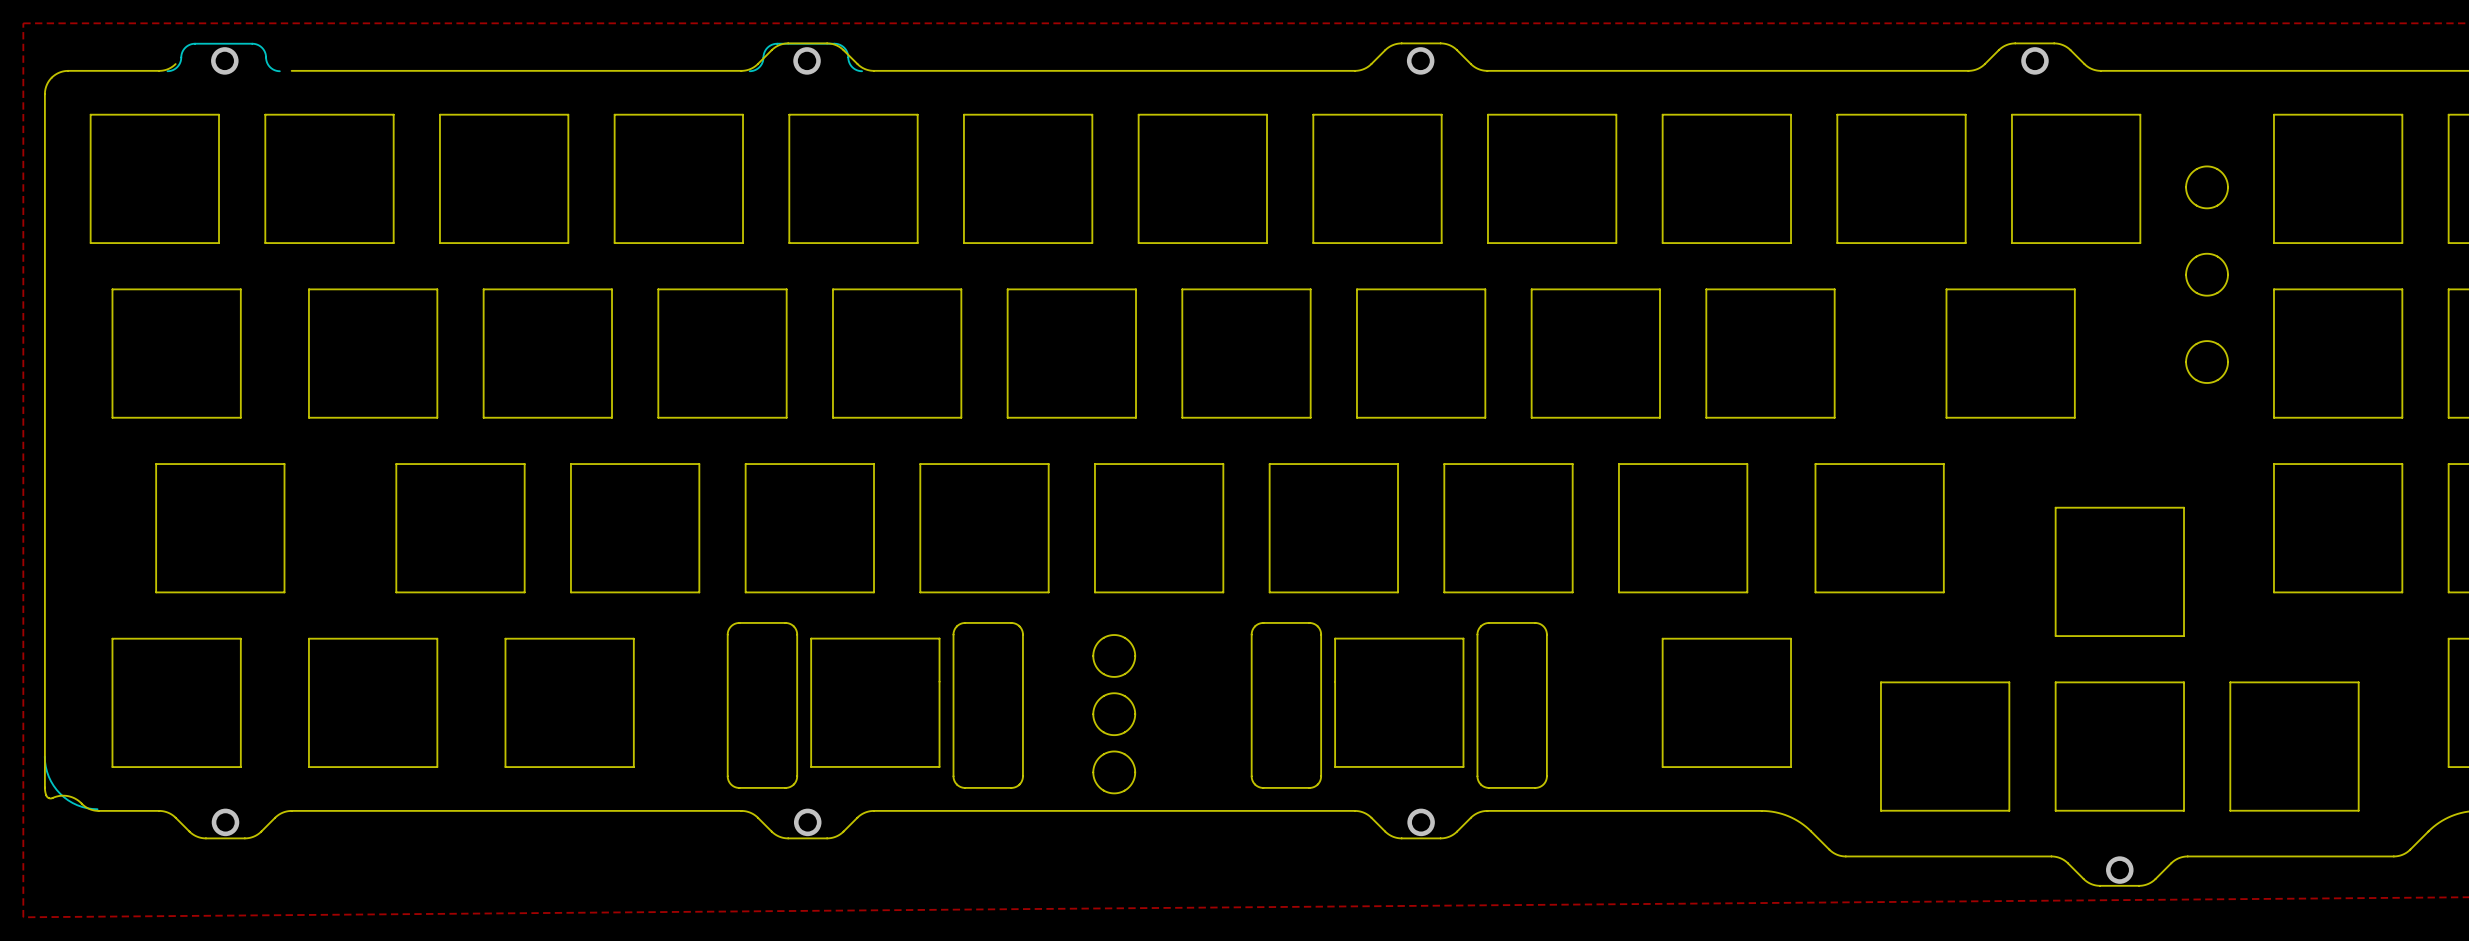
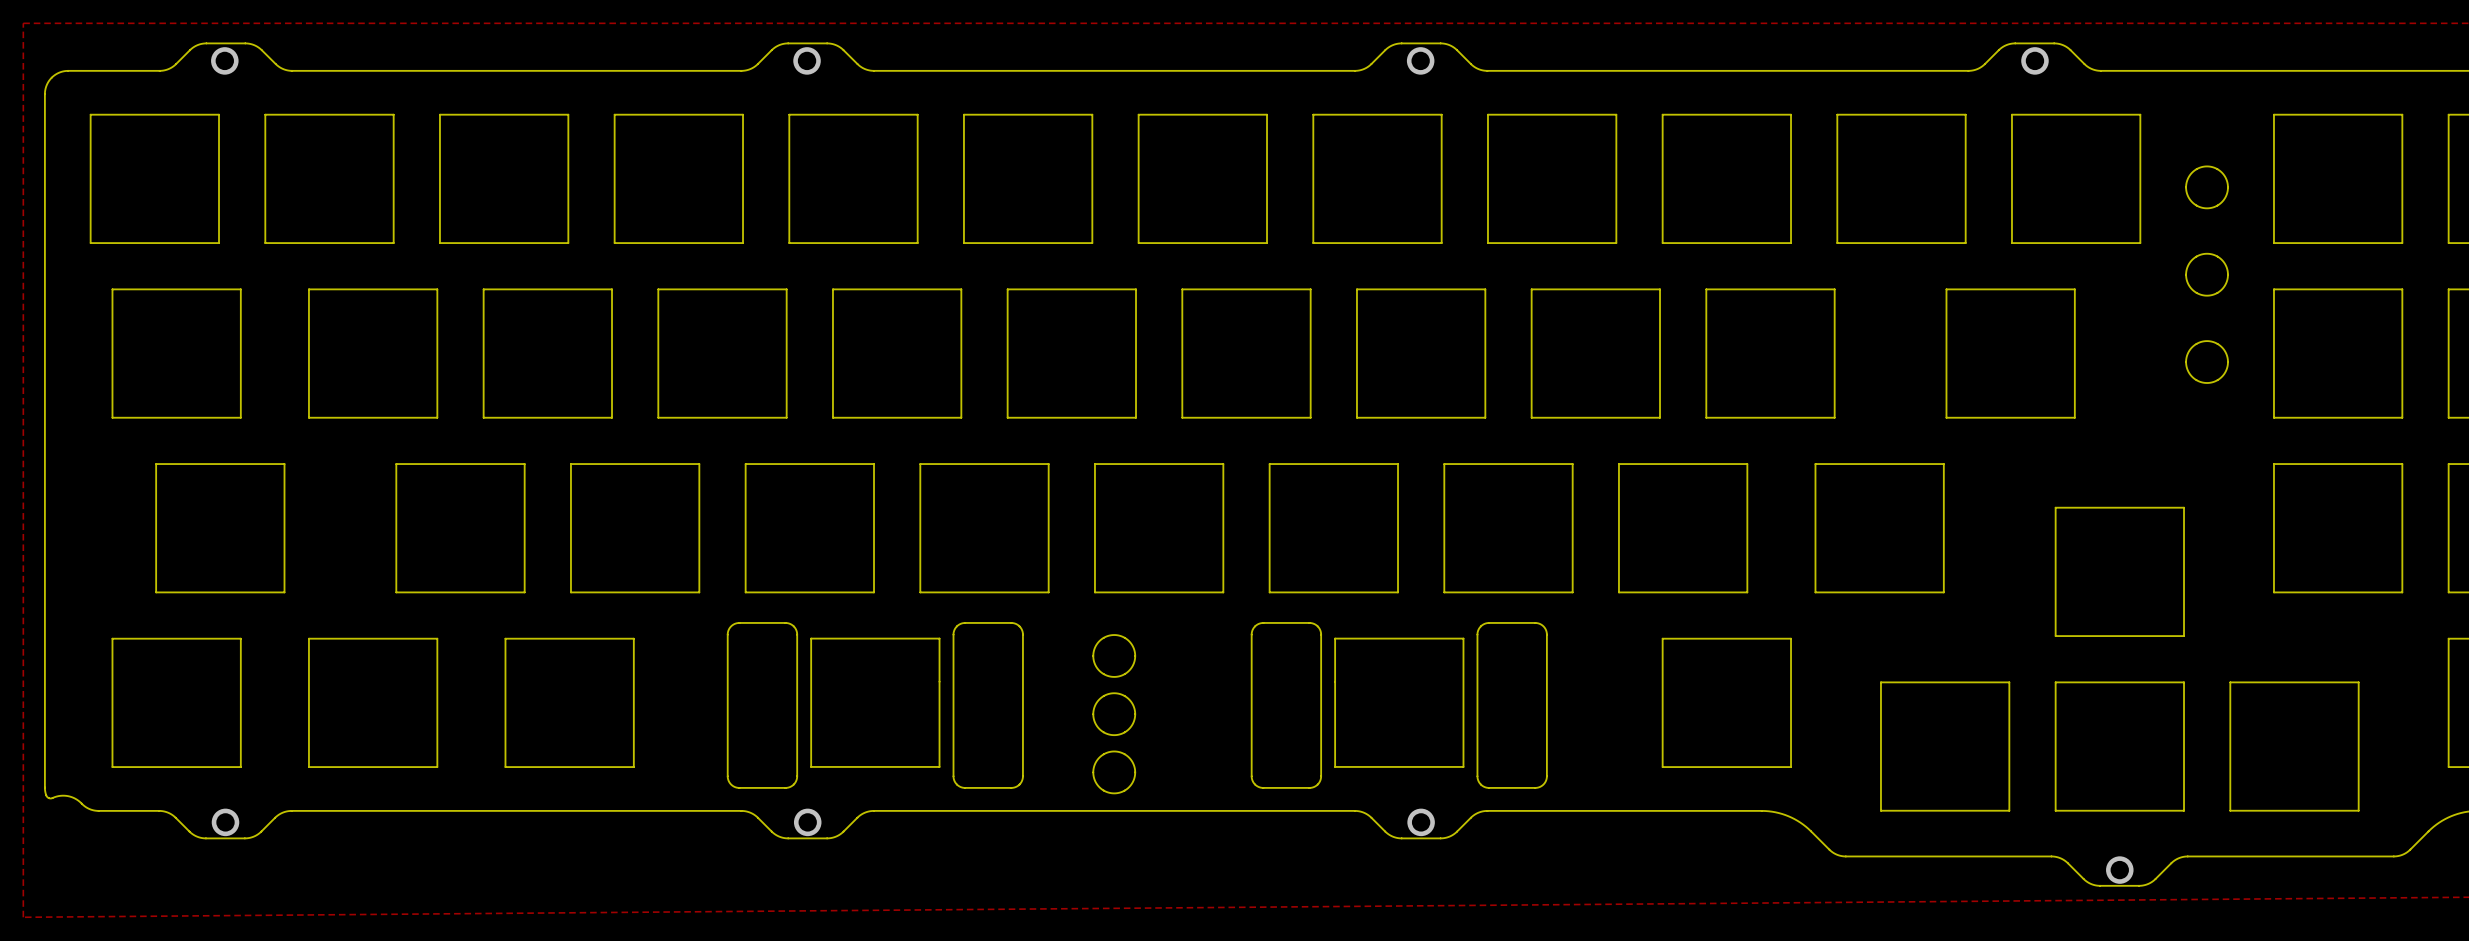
board edge: (175, 64) (169, 68) (160, 70) (68, 70) -> (292, 70) (279, 66) (260, 48) (252, 44) (206, 43) (193, 47) (174, 65) (164, 70) (68, 70)
line: (167, 71) (177, 67) (184, 49) (195, 43) (255, 44) (264, 50) (270, 67) (279, 71) -> none
line: (749, 71) (759, 67) (766, 49) (777, 43) (838, 44) (846, 50) (852, 67) (862, 71) -> none
line: (44, 756) (48, 776) (60, 793) (77, 805) (97, 809) -> none

